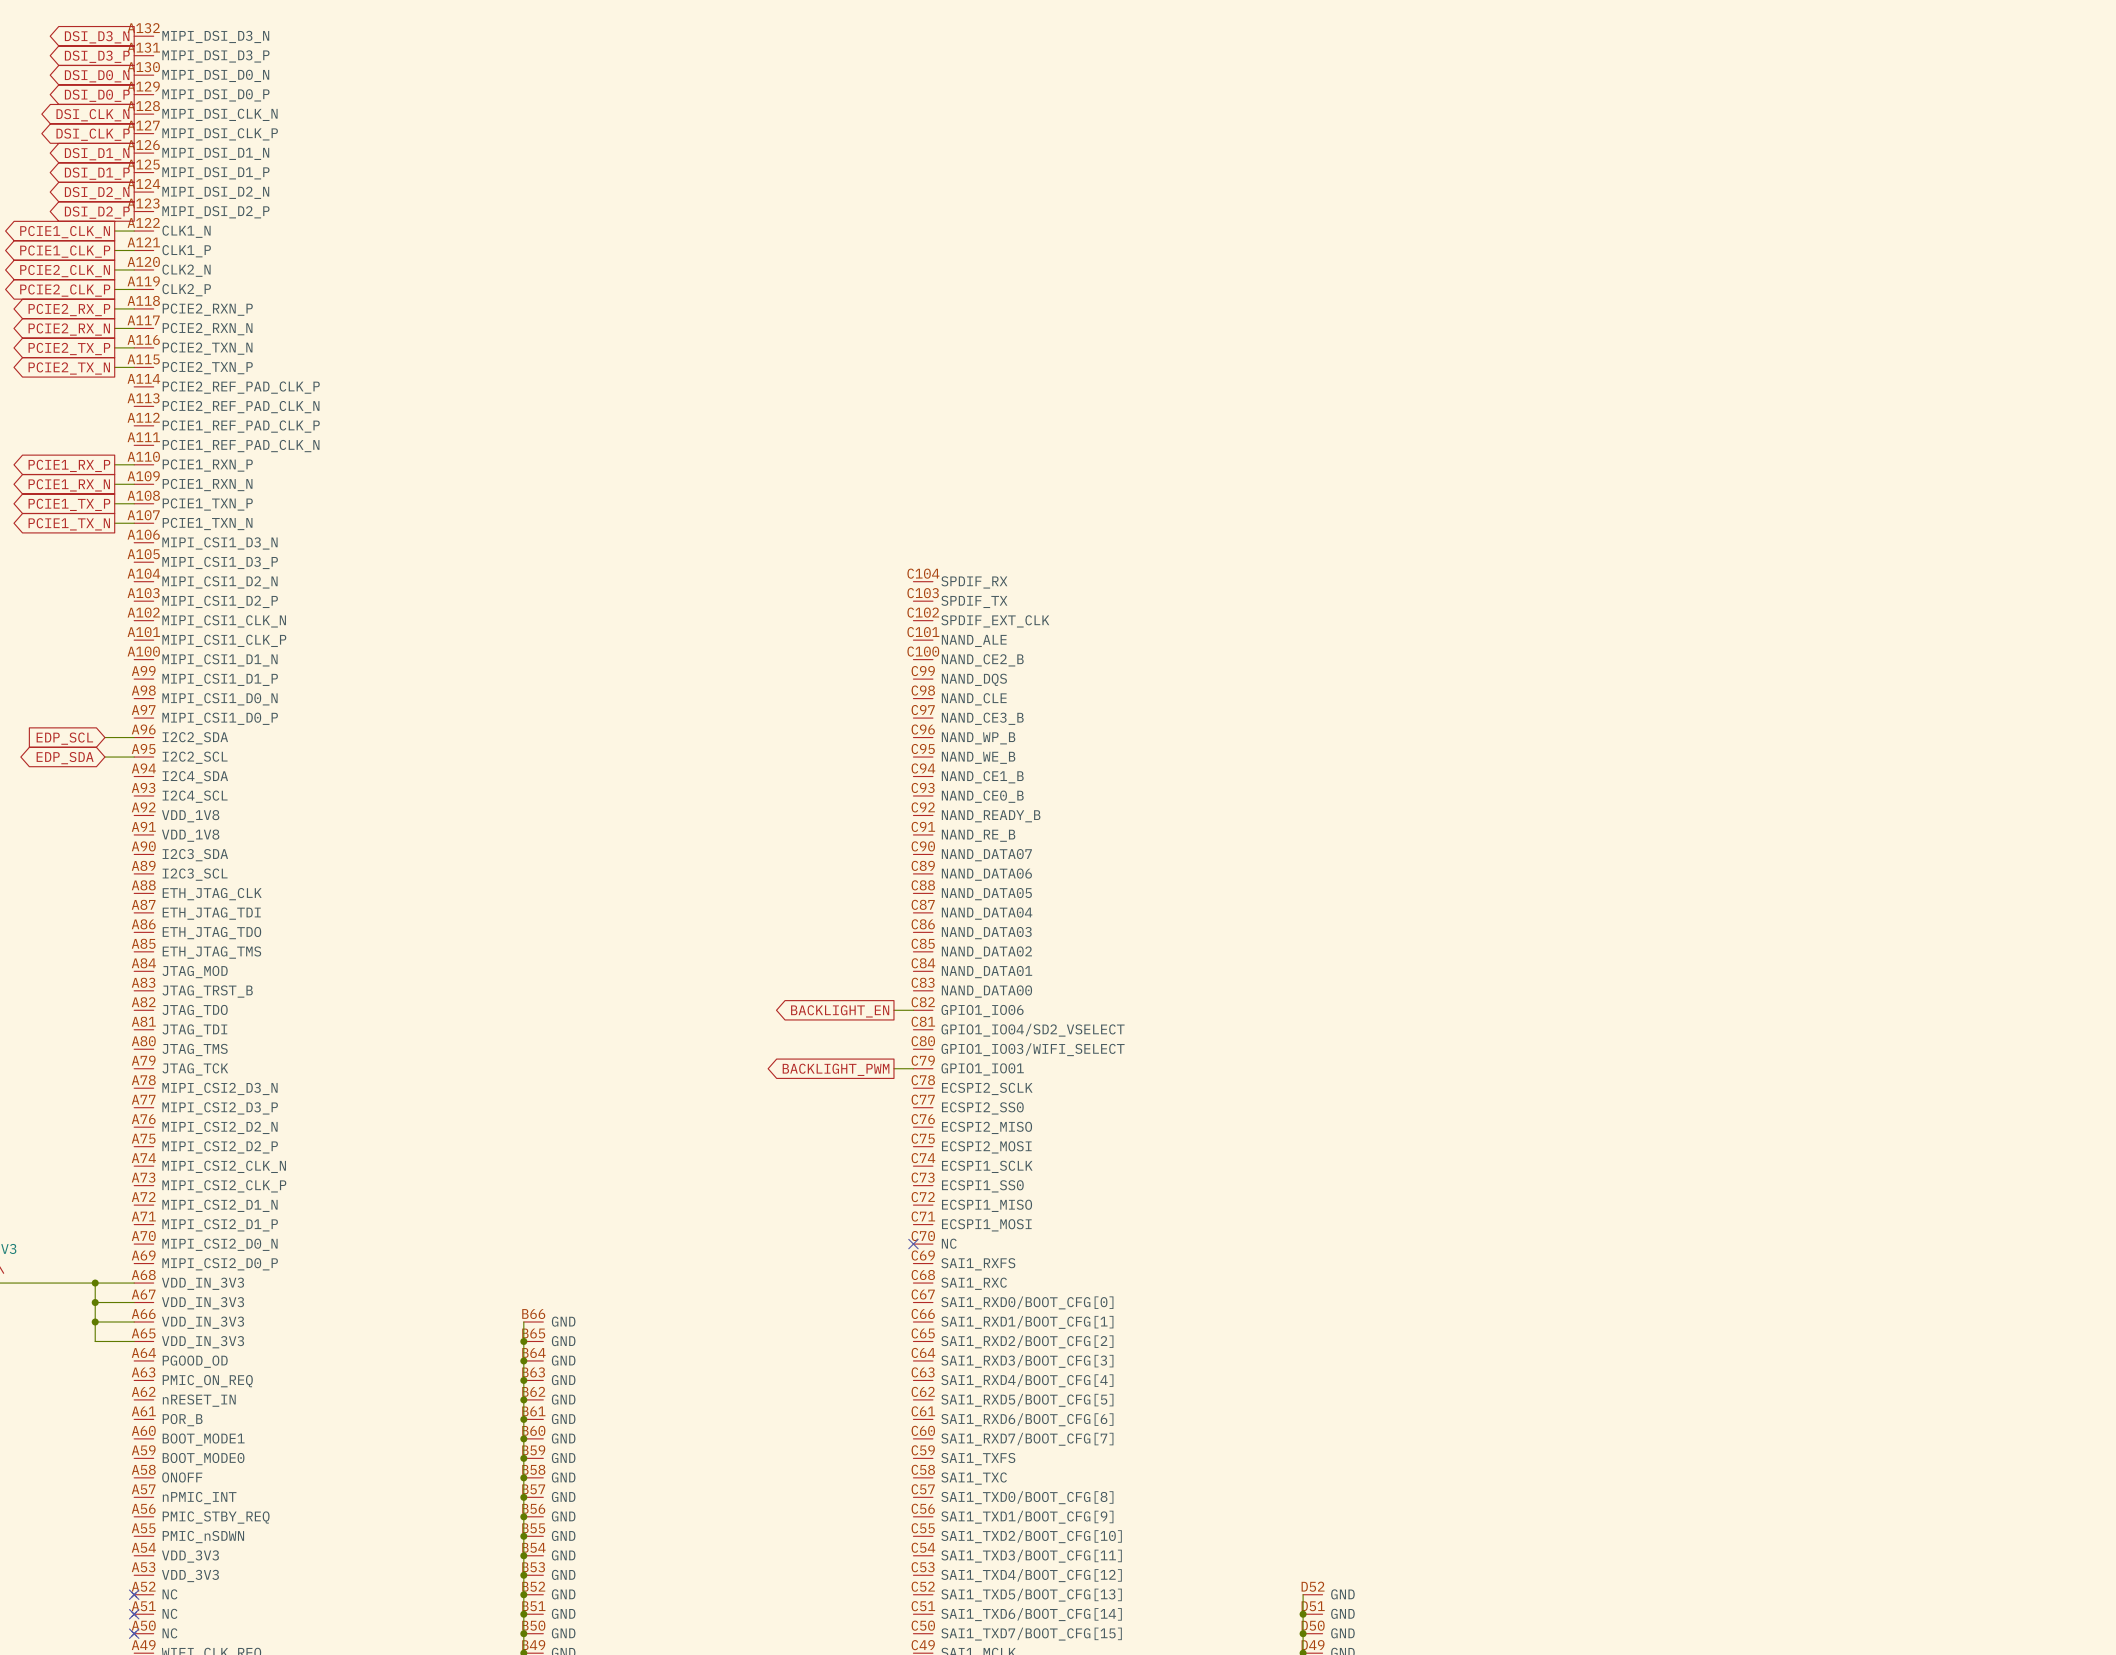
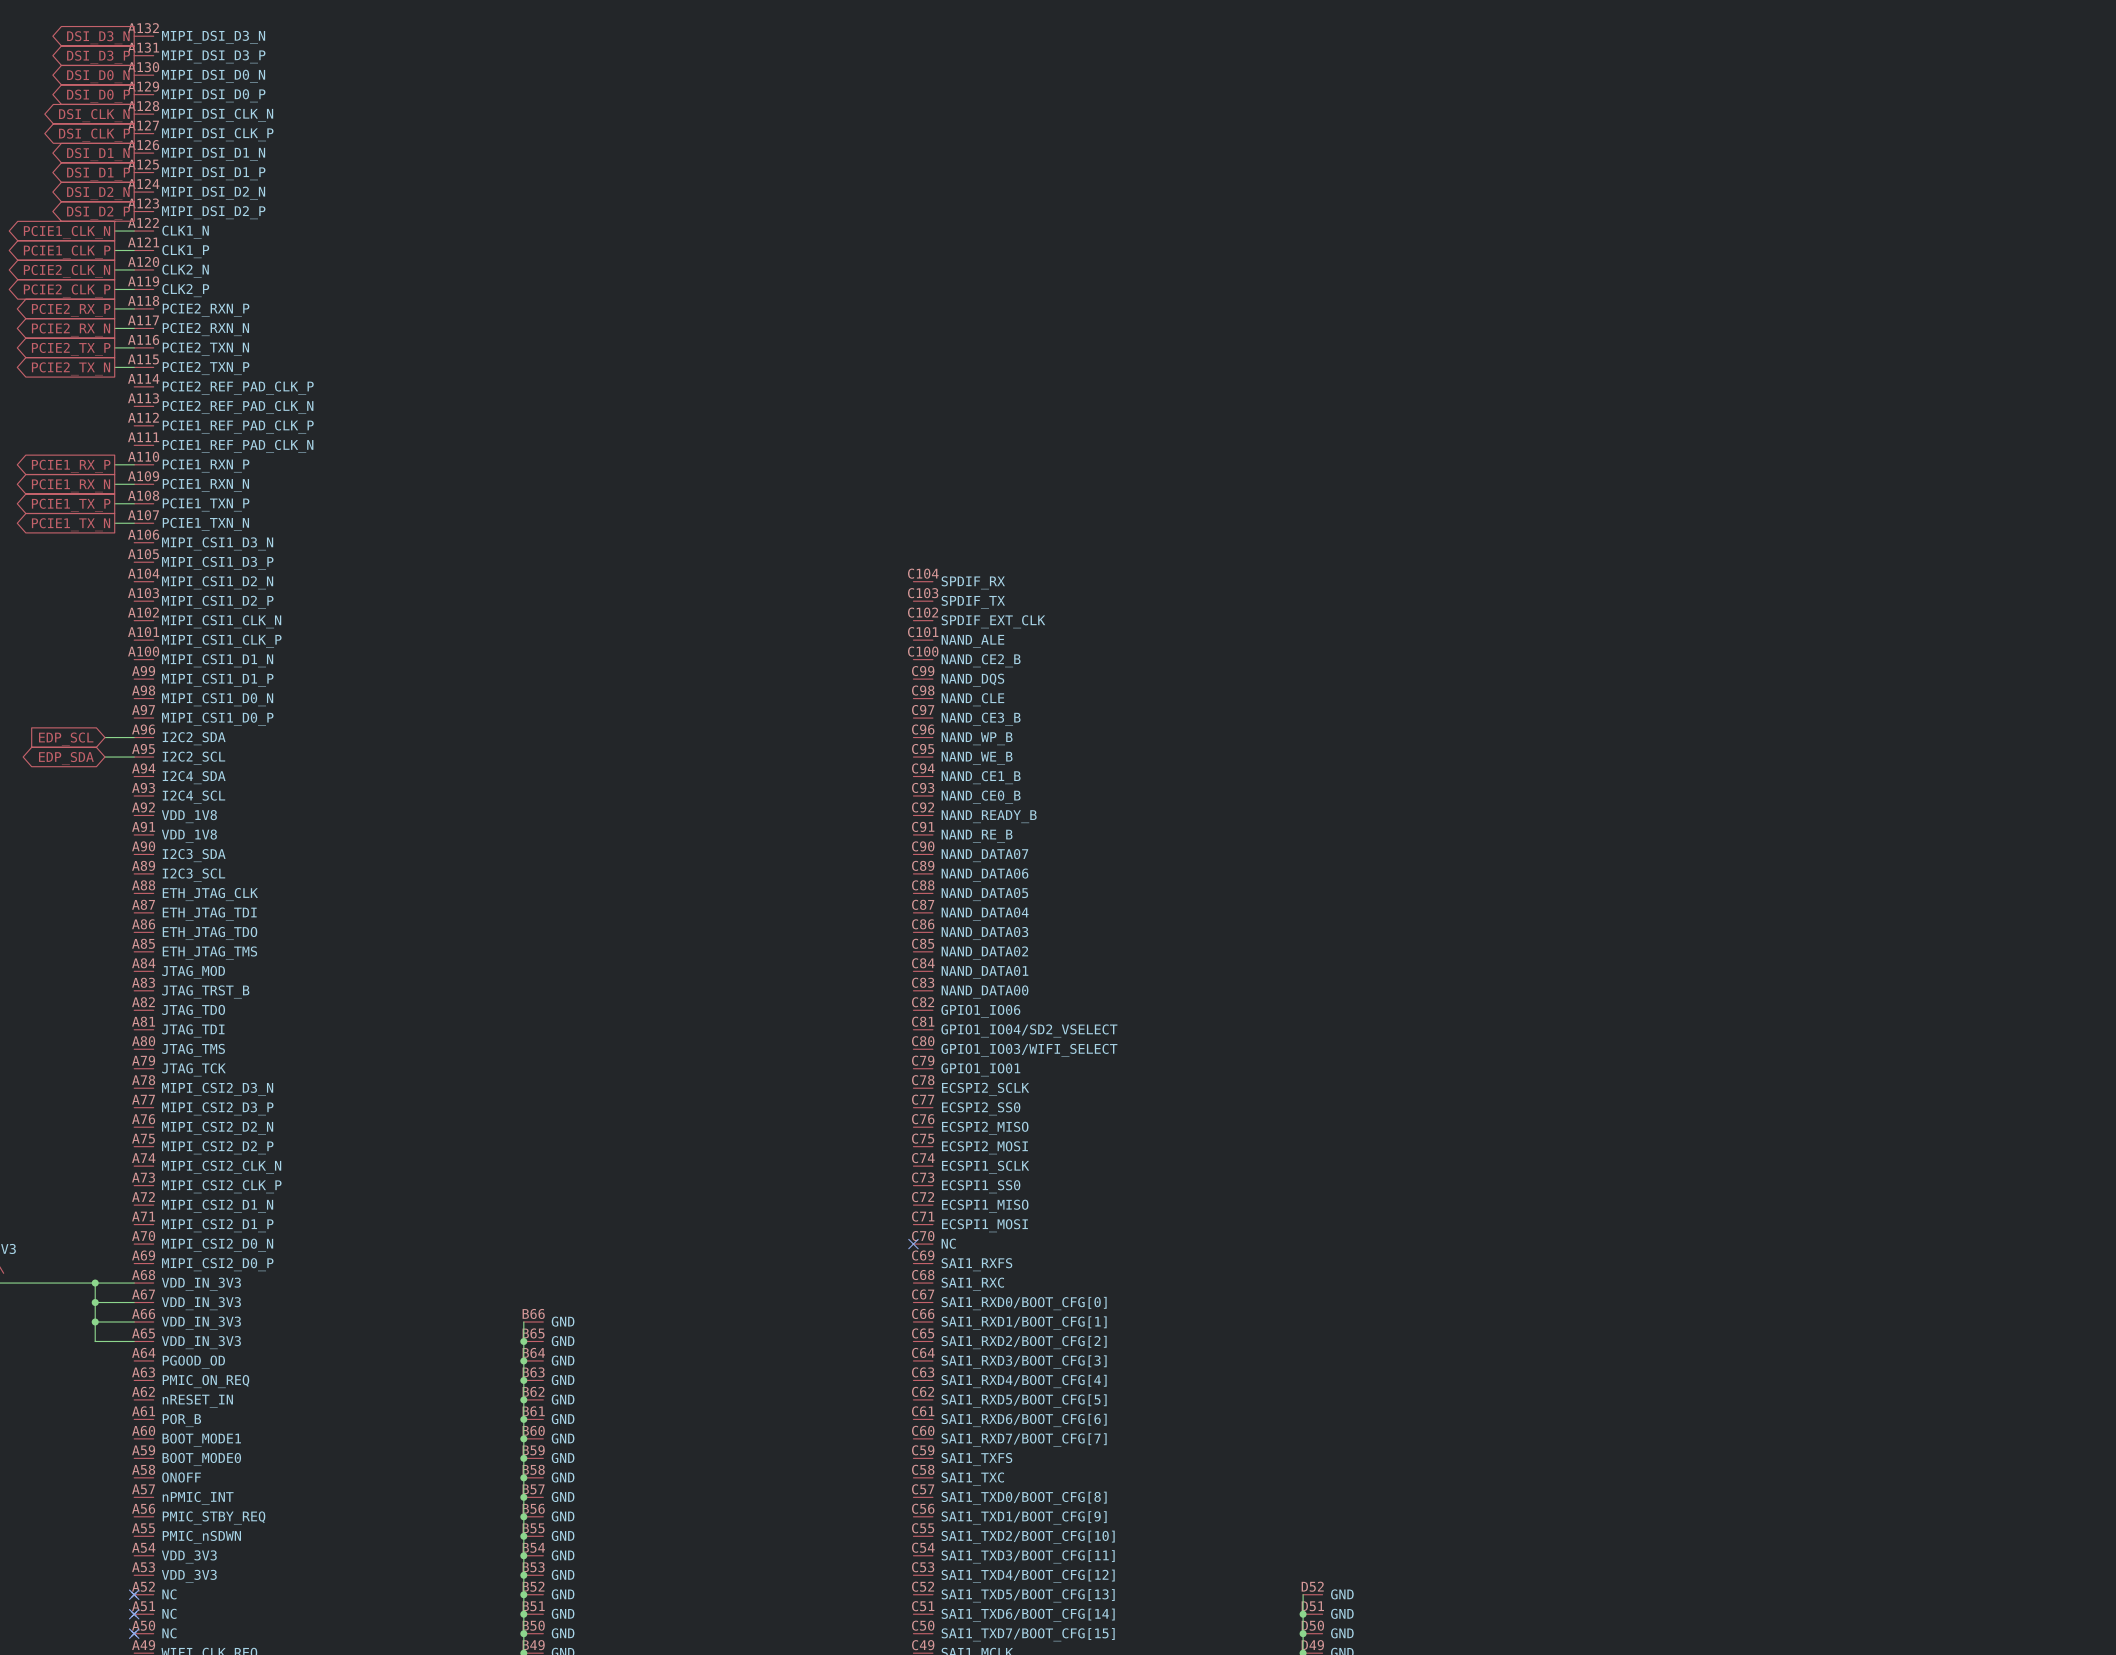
wire: (893, 1010) (913, 1010) -> none
global label: BACKLIGHT_EN (840, 1011) -> none
wire: (893, 1068) (913, 1068) -> none
global label: BACKLIGHT_PWM (836, 1069) -> none

